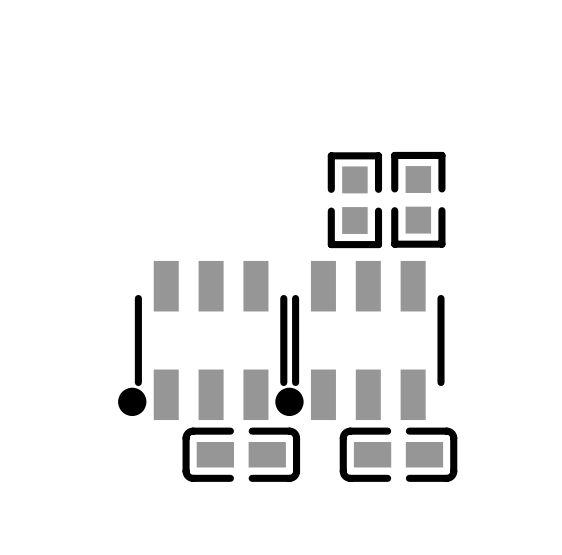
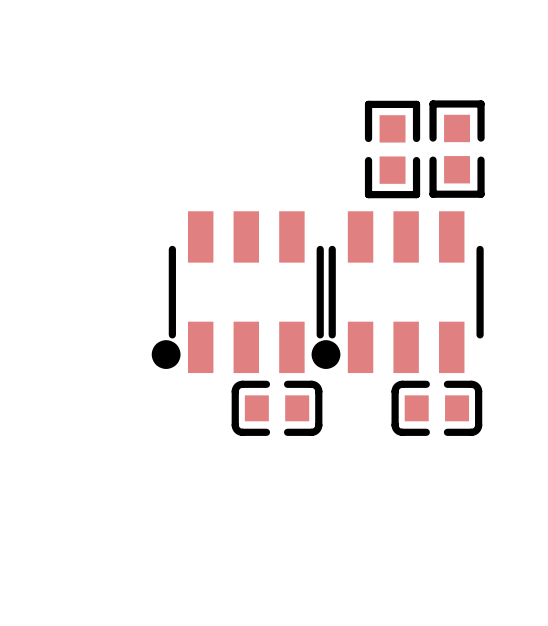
part footprint: [182, 427, 301, 482] -> [231, 380, 323, 436]
part footprint: [339, 427, 458, 482] -> [391, 380, 483, 436]

